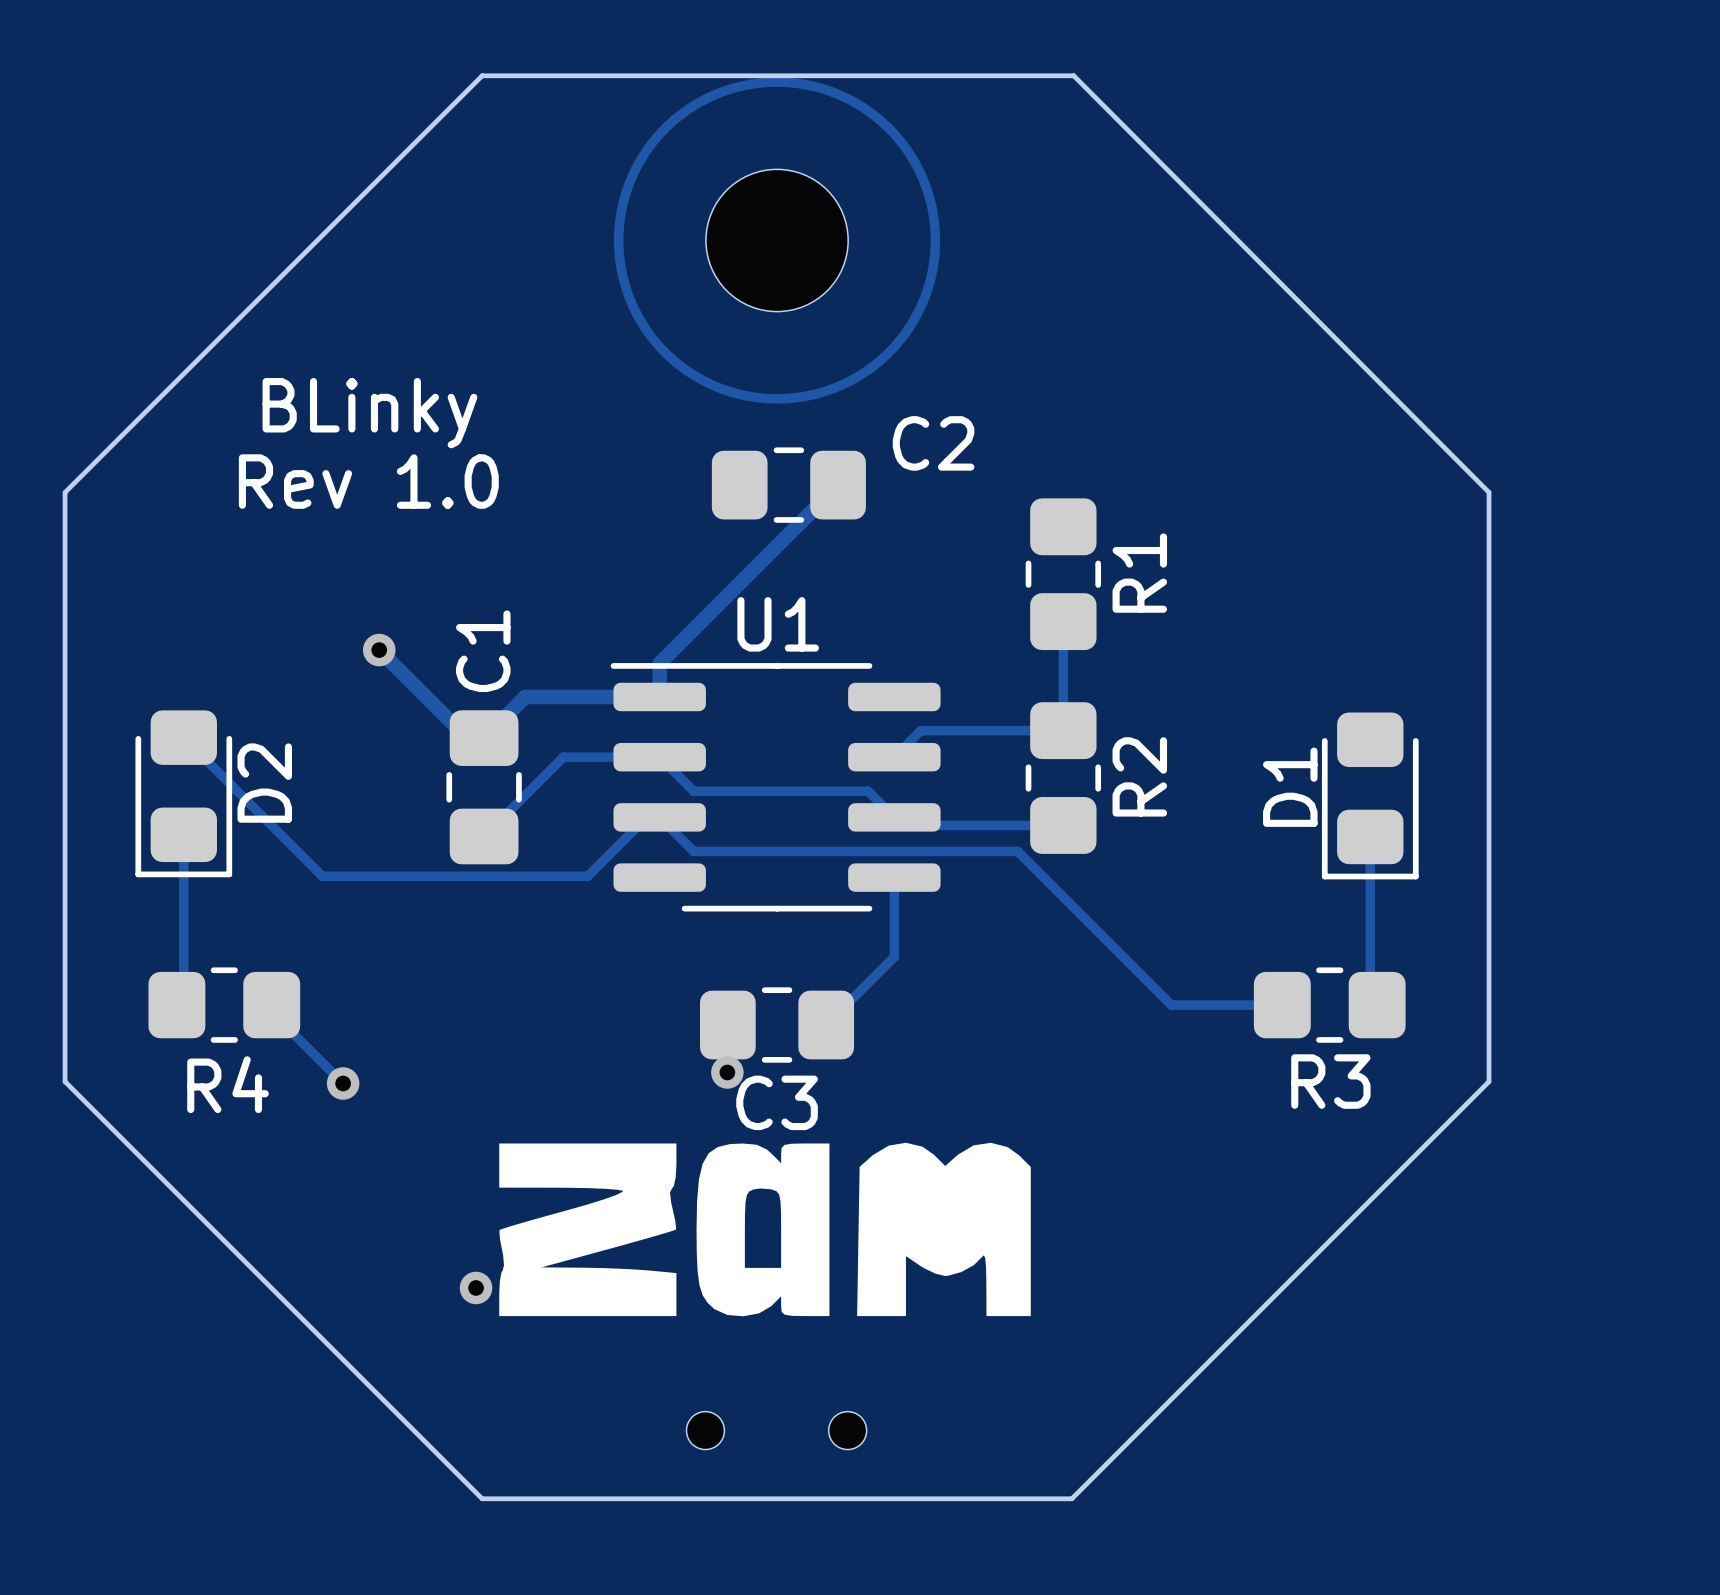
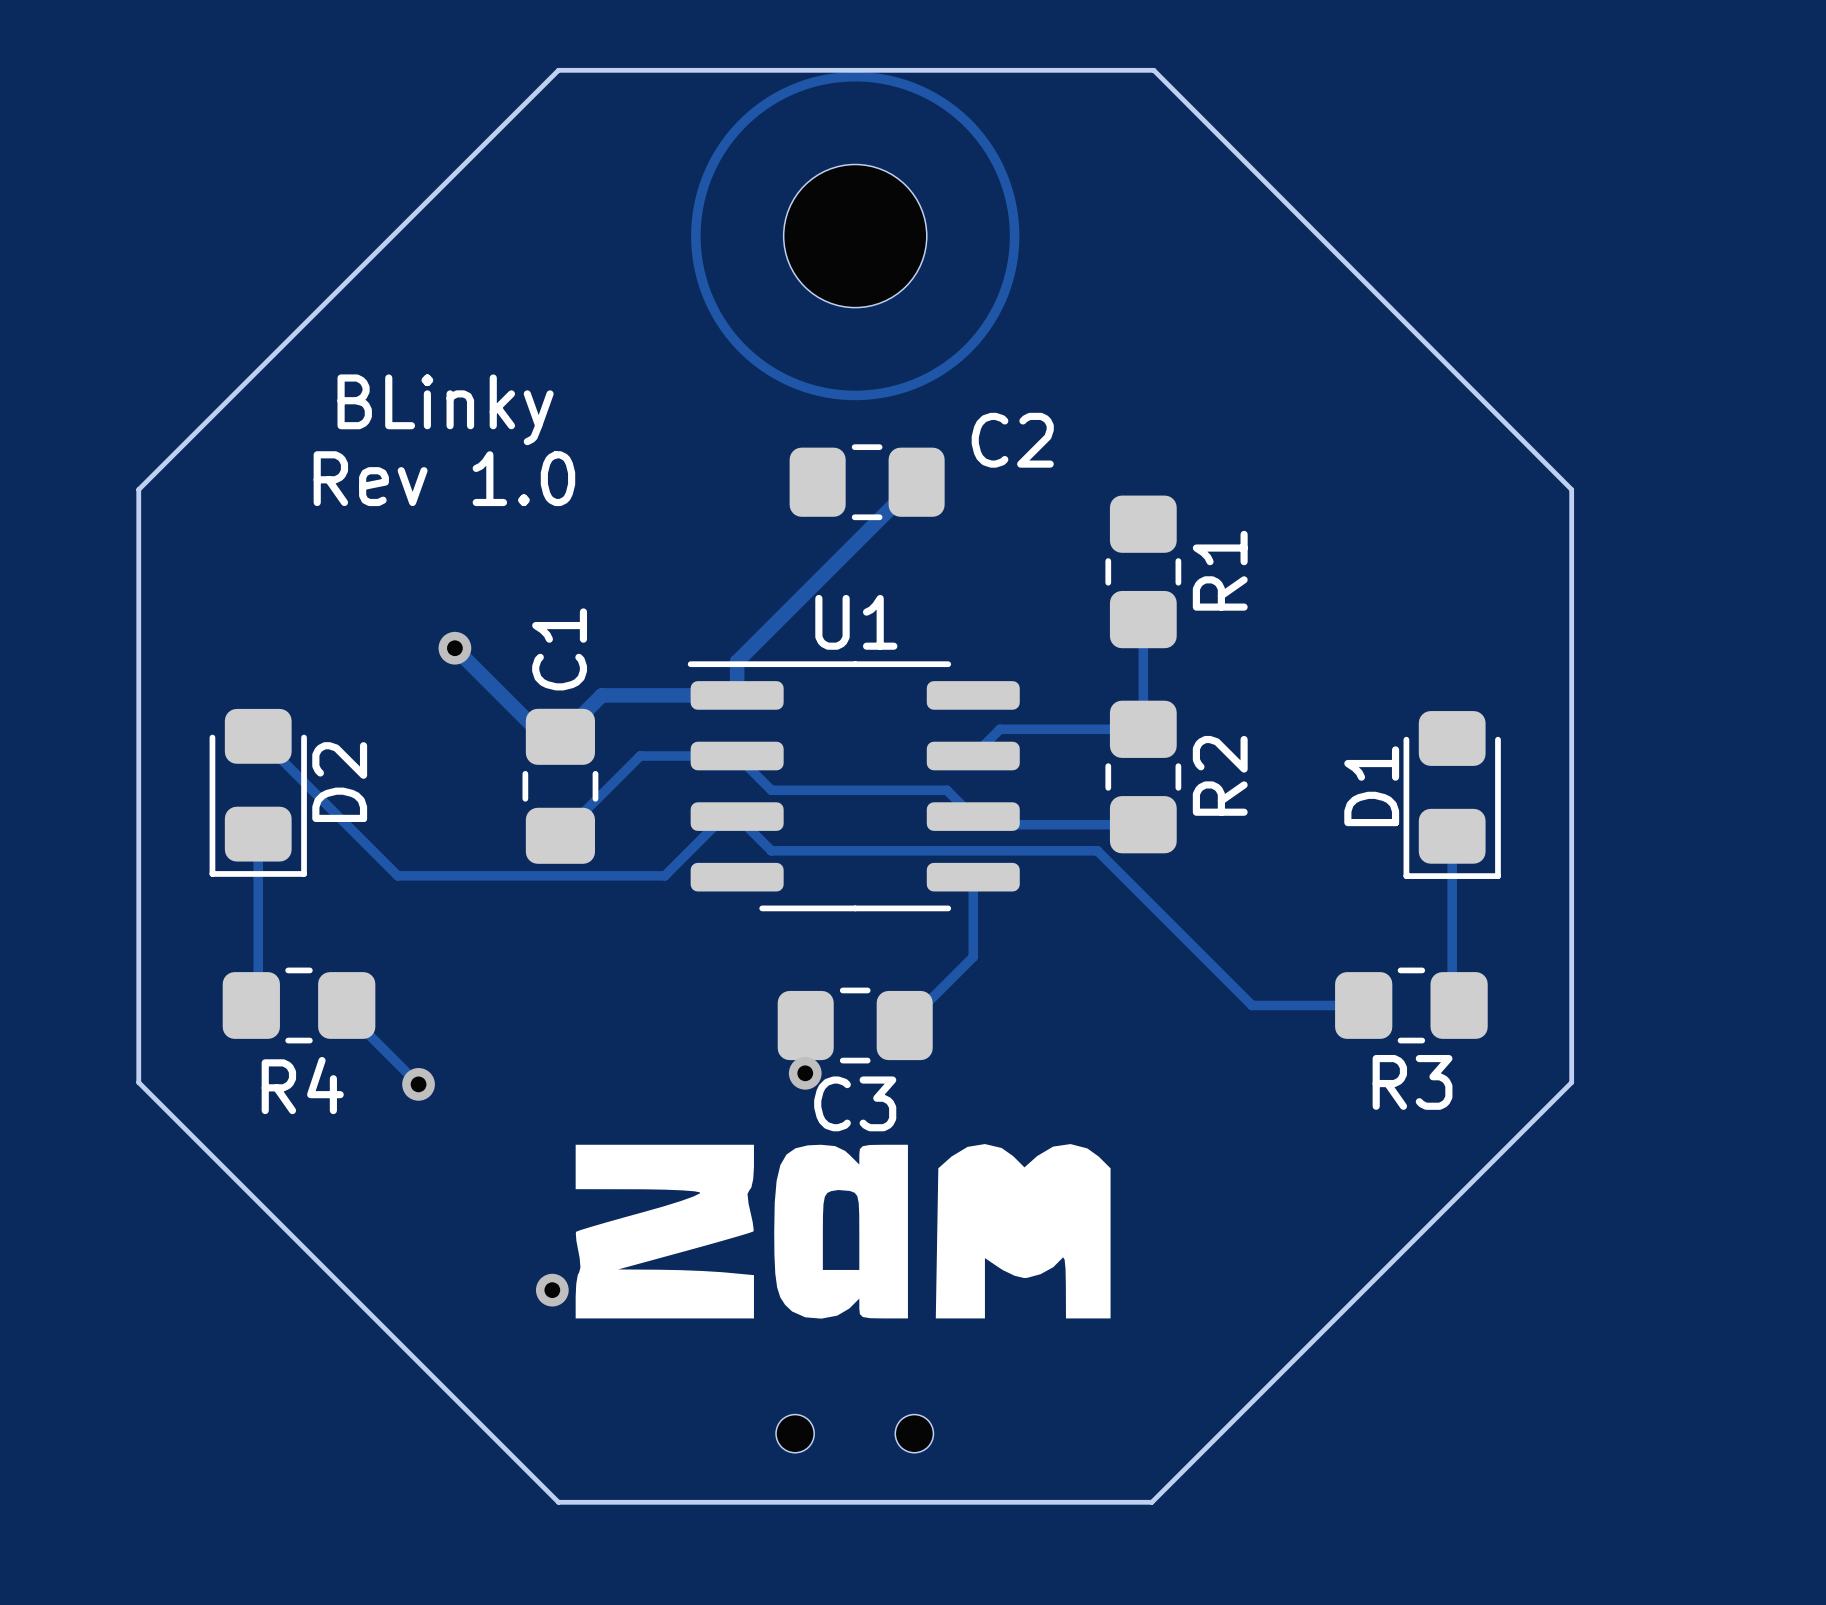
part footprint: [686, 1411, 867, 1450] -> [776, 1414, 934, 1453]

